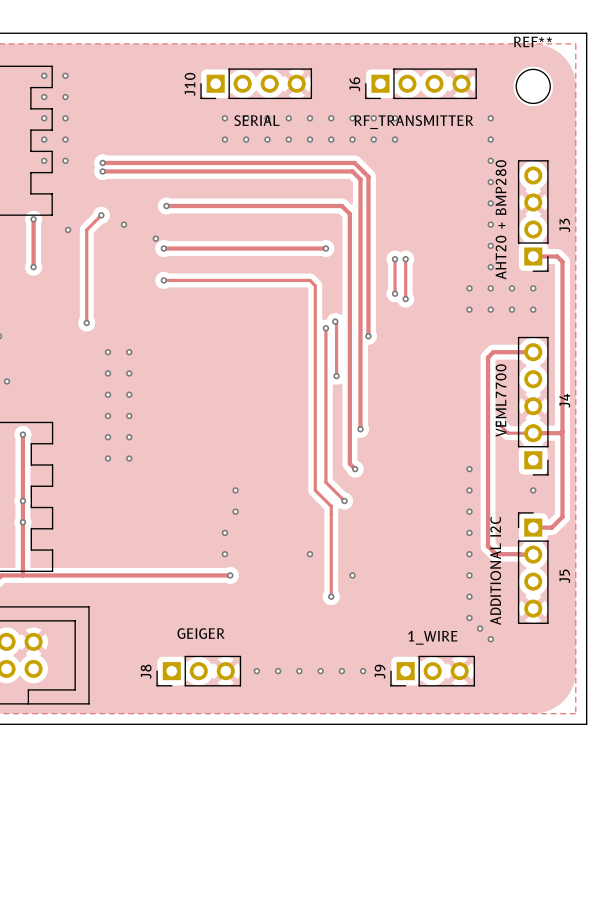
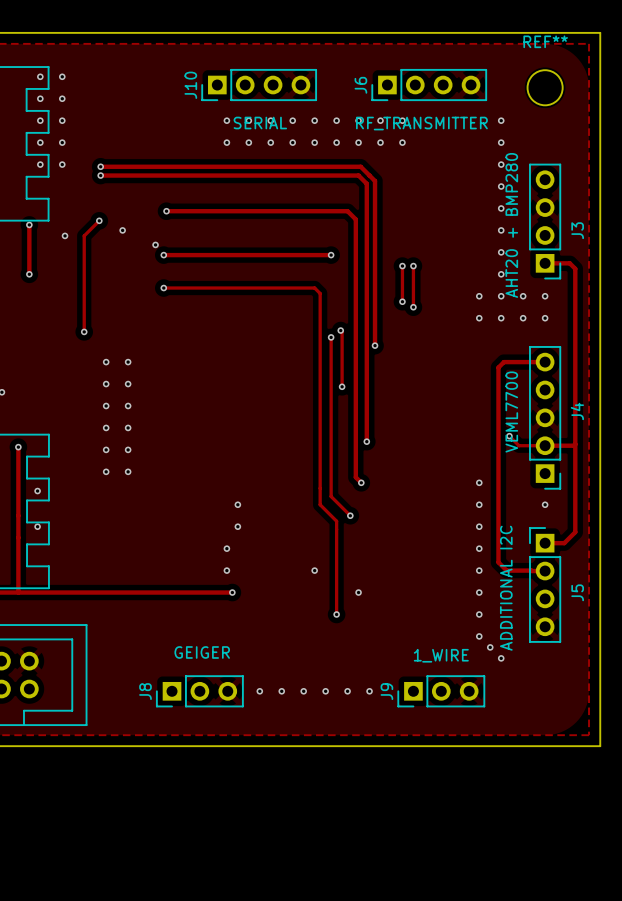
via: none -> (37, 491)
via: (22, 501) -> none
via: none -> (37, 526)
via: (22, 522) -> none

